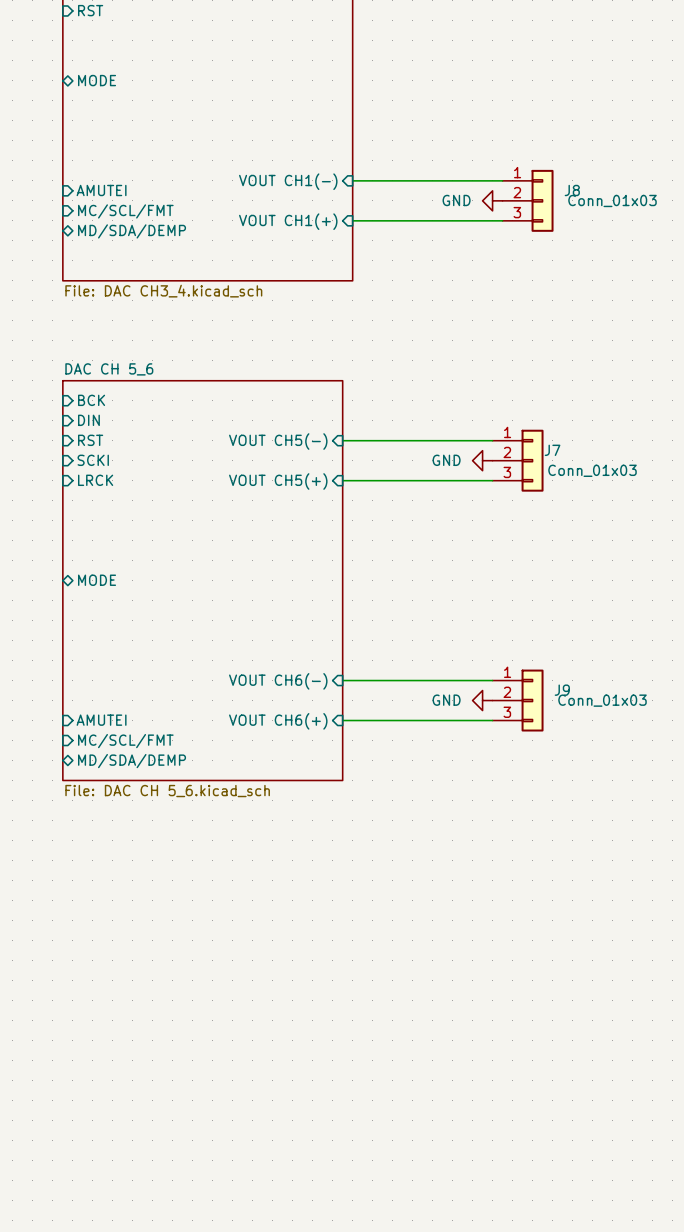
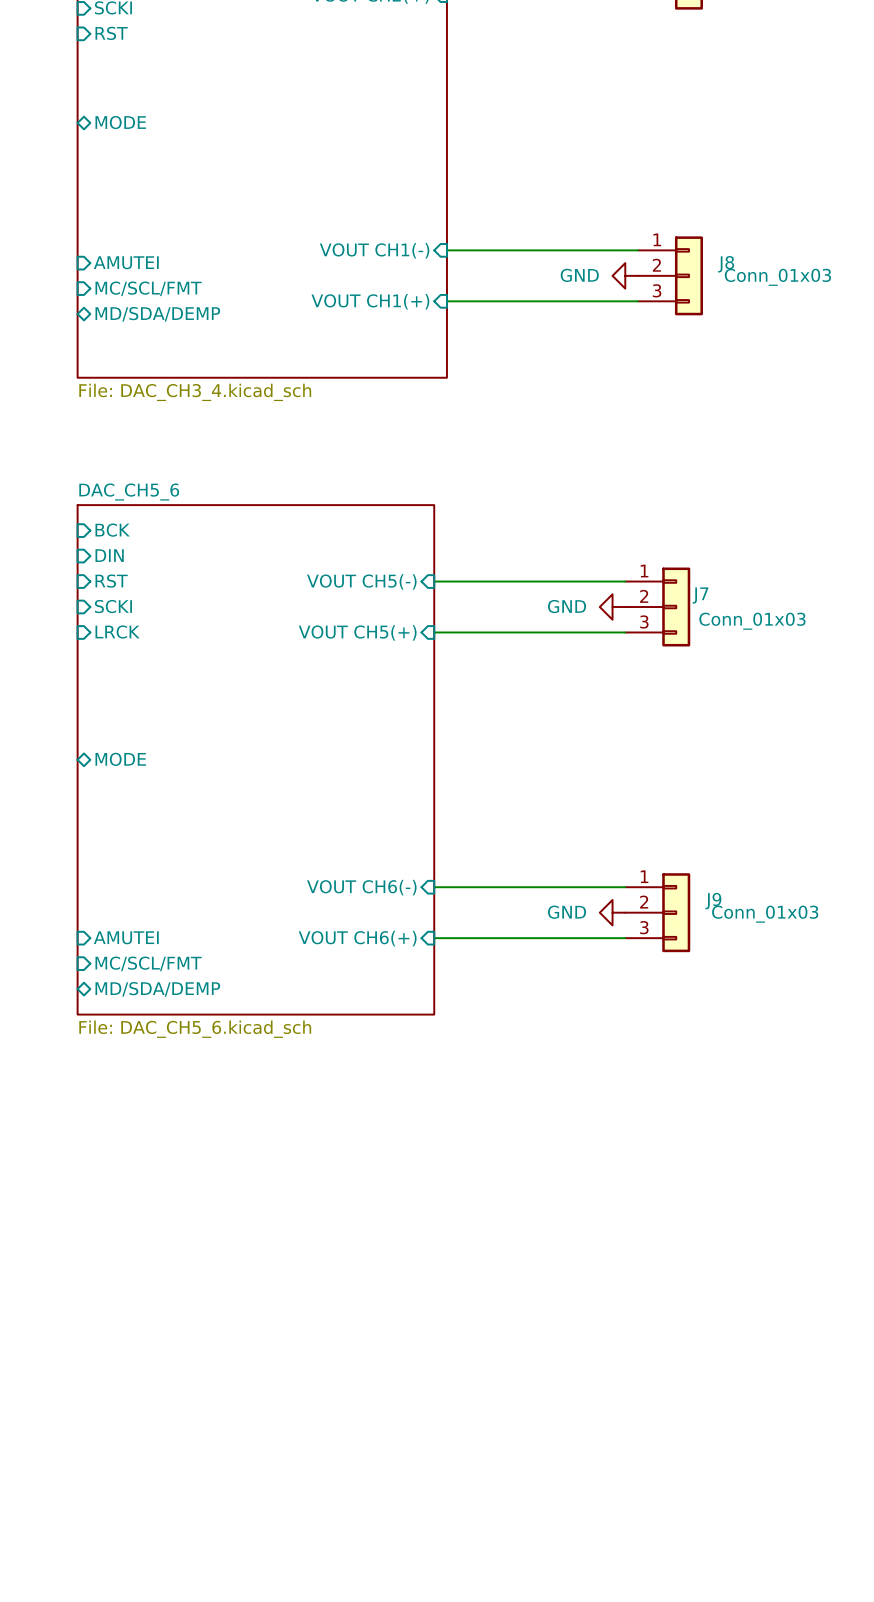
sheet value: File: DAC CH3_4.kicad_sch (163, 291) -> File: DAC_CH3_4.kicad_sch (195, 392)
sheet DAC CH 5_6 name: DAC CH 5_6 (109, 369) -> DAC_CH5_6 (129, 491)
sheet DAC CH 5_6 value: File: DAC CH 5_6.kicad_sch (167, 791) -> File: DAC_CH5_6.kicad_sch (195, 1029)

